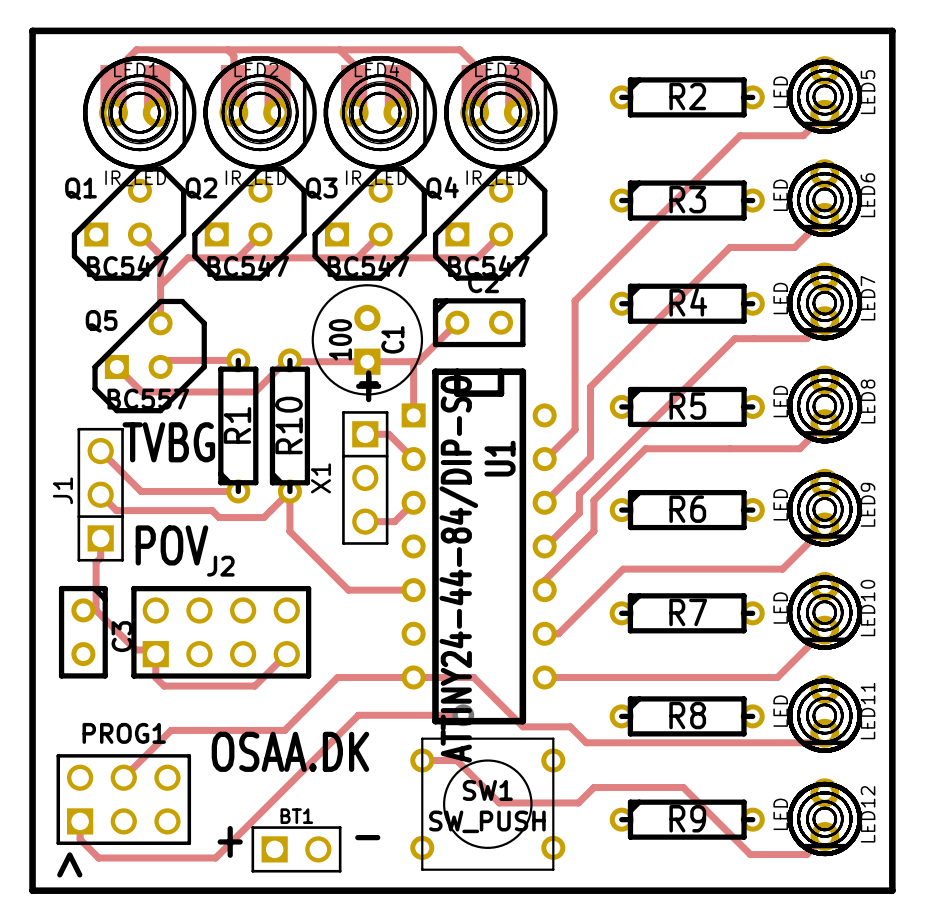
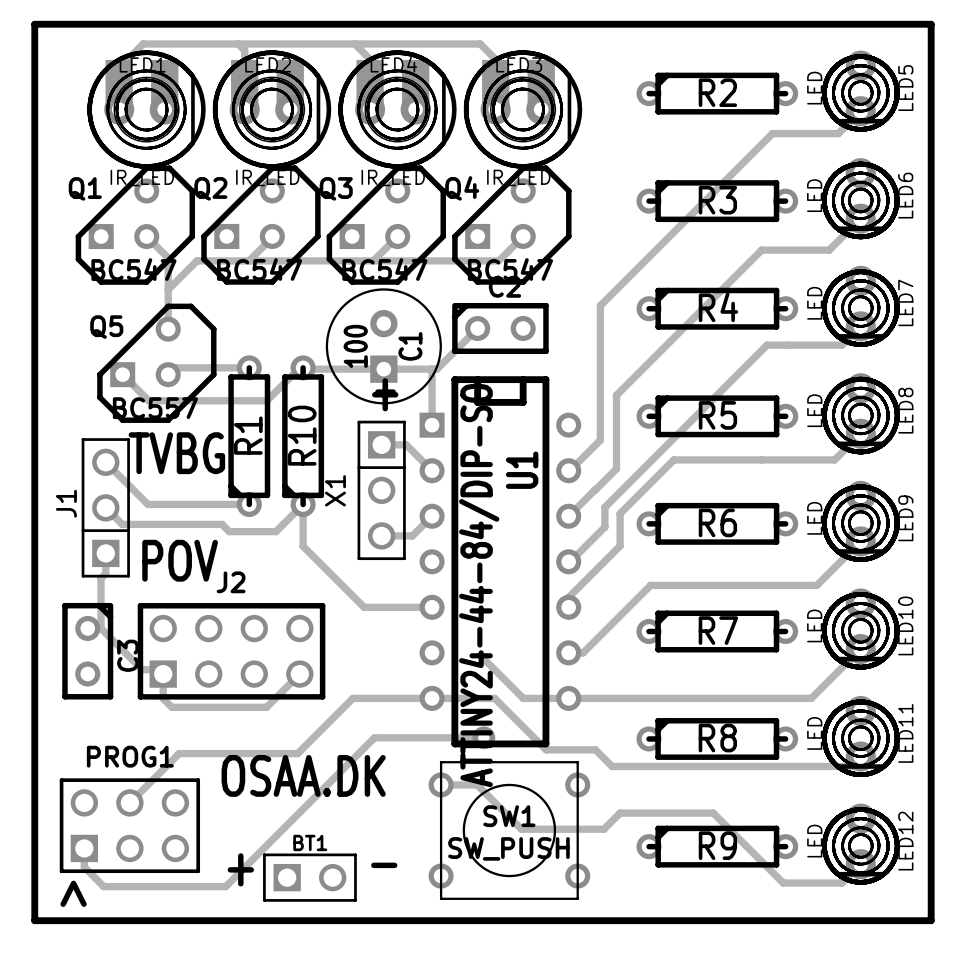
track: none -> (483, 658) (523, 698) (568, 698)

